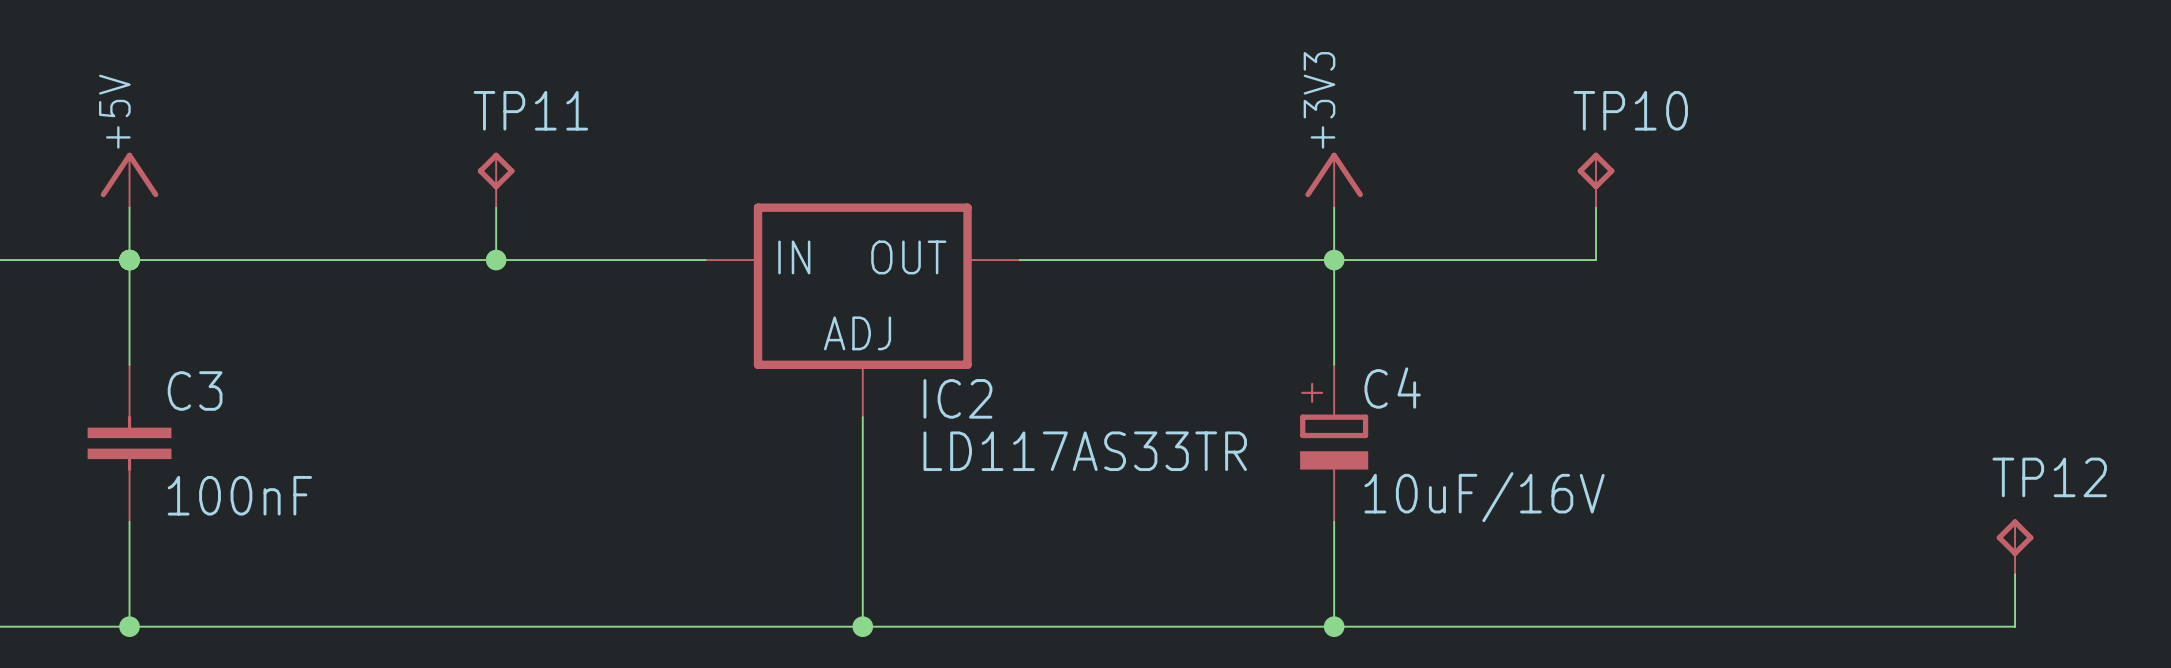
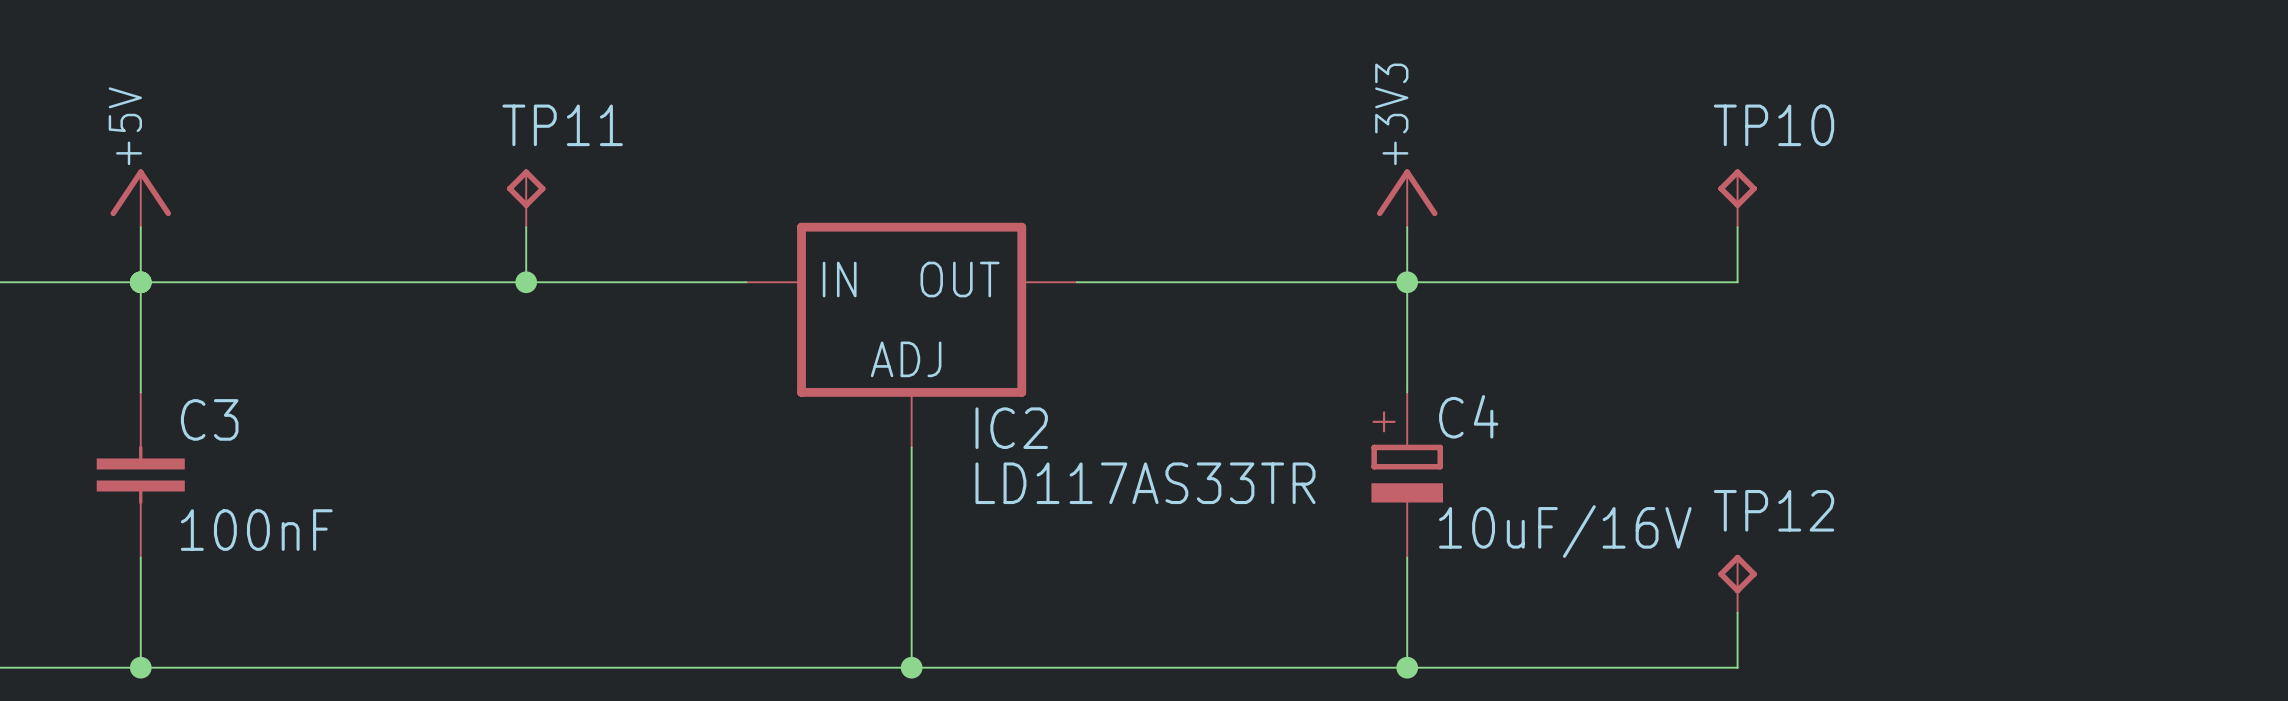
TP10 position: (1596, 180) -> (1737, 198)
wire: (1596, 207) (1596, 260) -> (1737, 227) (1737, 282) (1682, 282)
TP12 position: (2015, 546) -> (1737, 583)
wire: (2015, 574) (2015, 626) (1648, 626) -> (1737, 612) (1737, 667)

